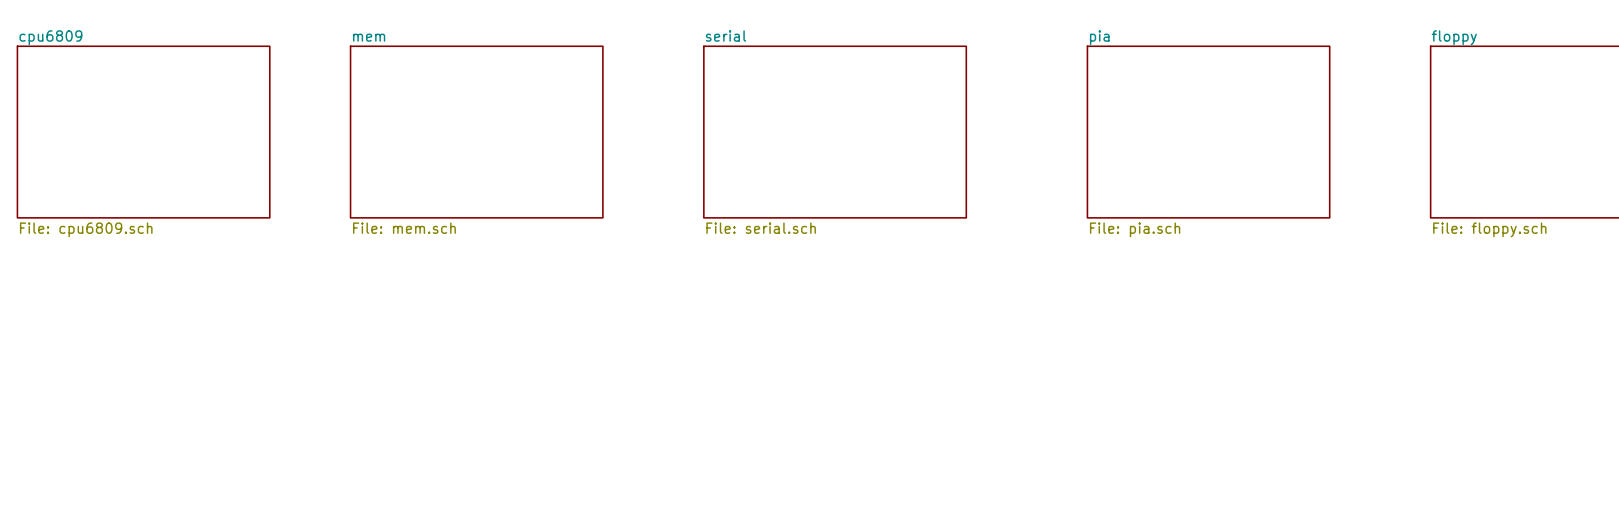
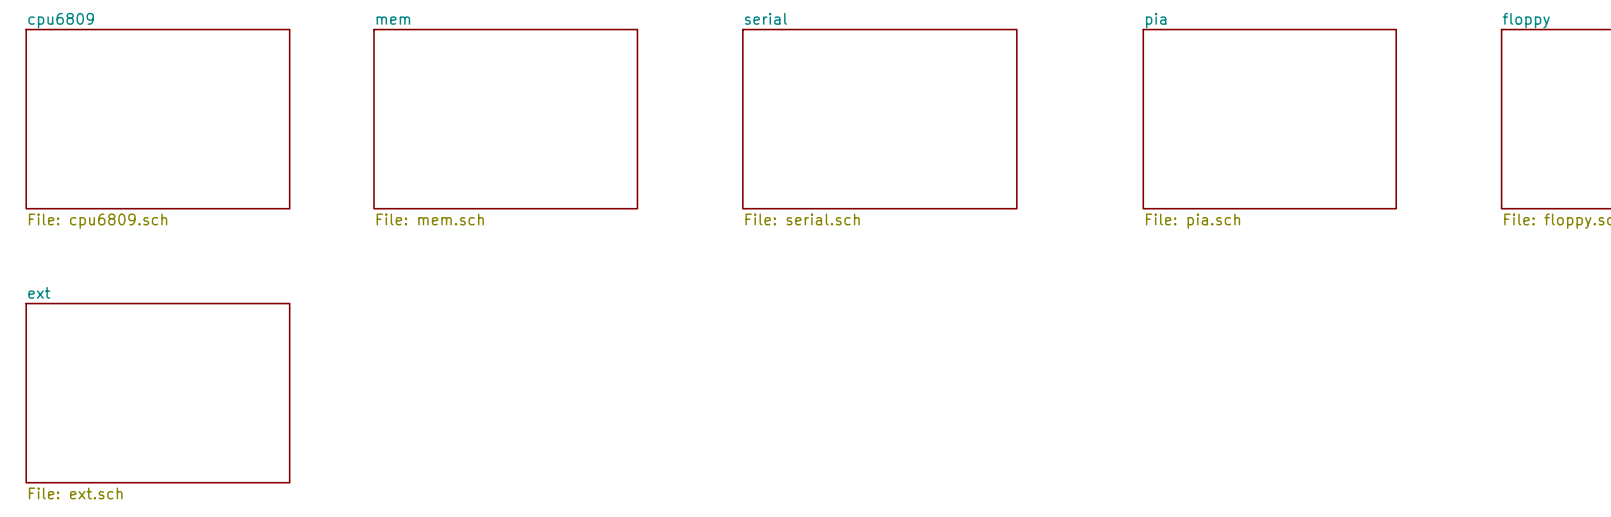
sheet ext: none -> File: ext.sch (157, 393)

